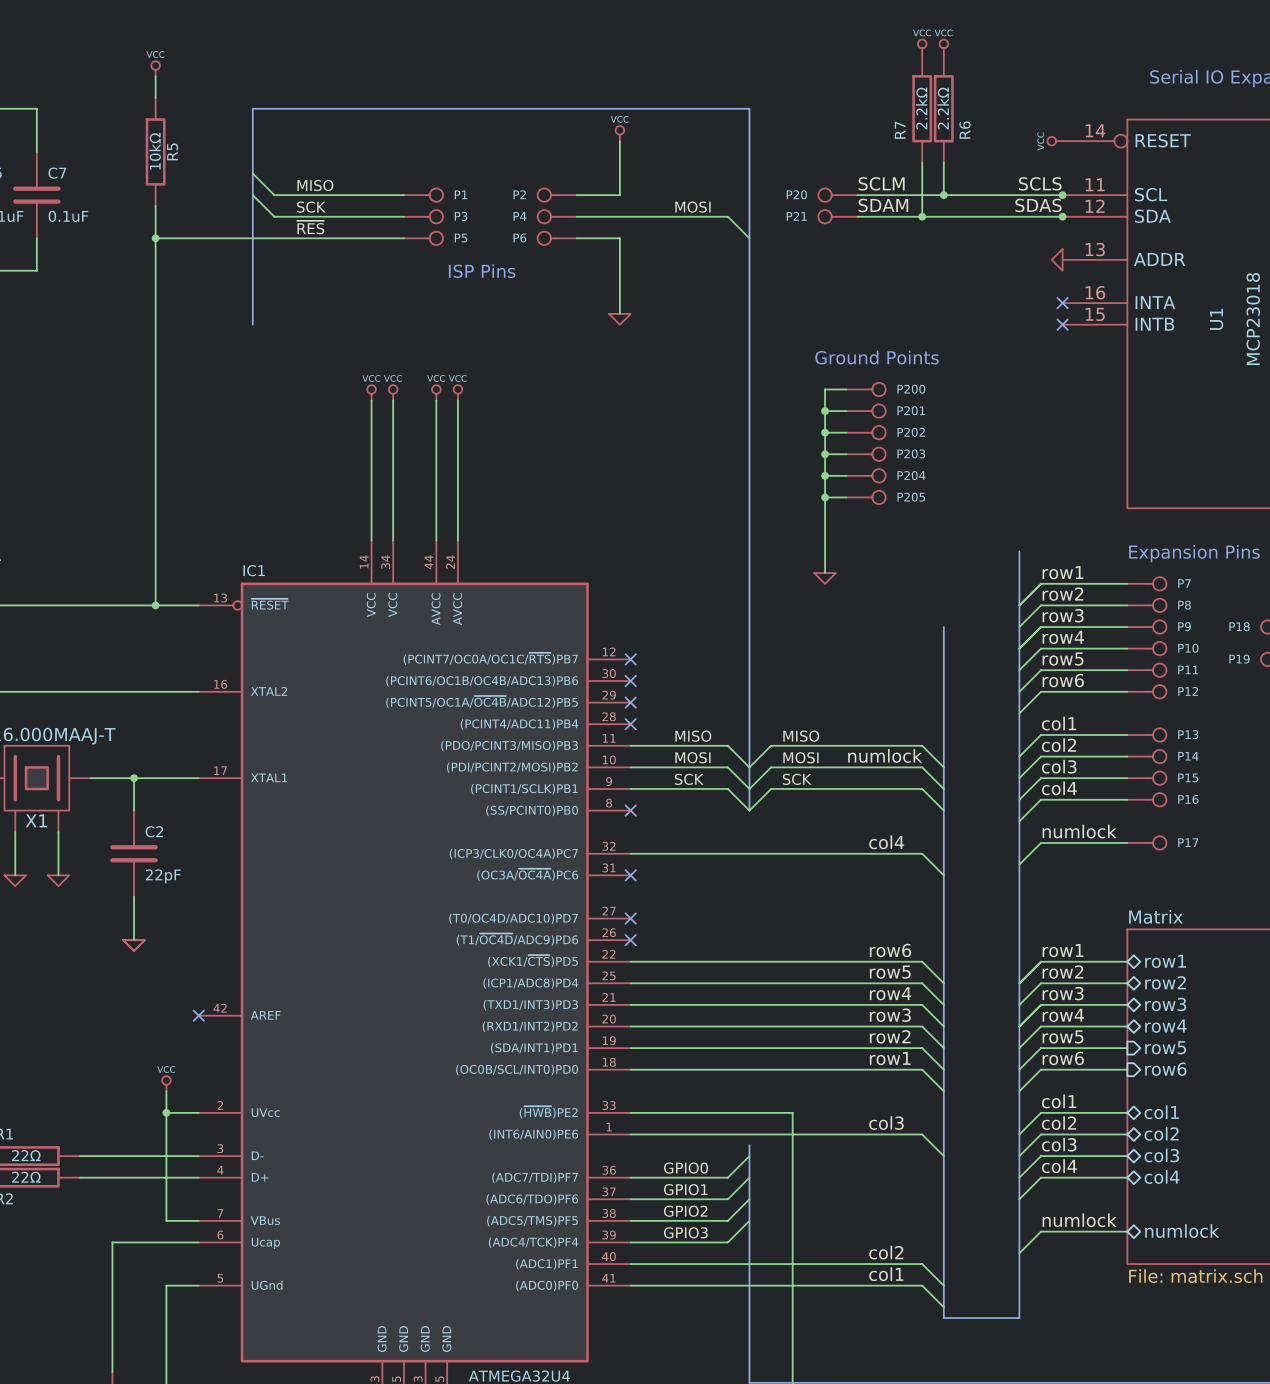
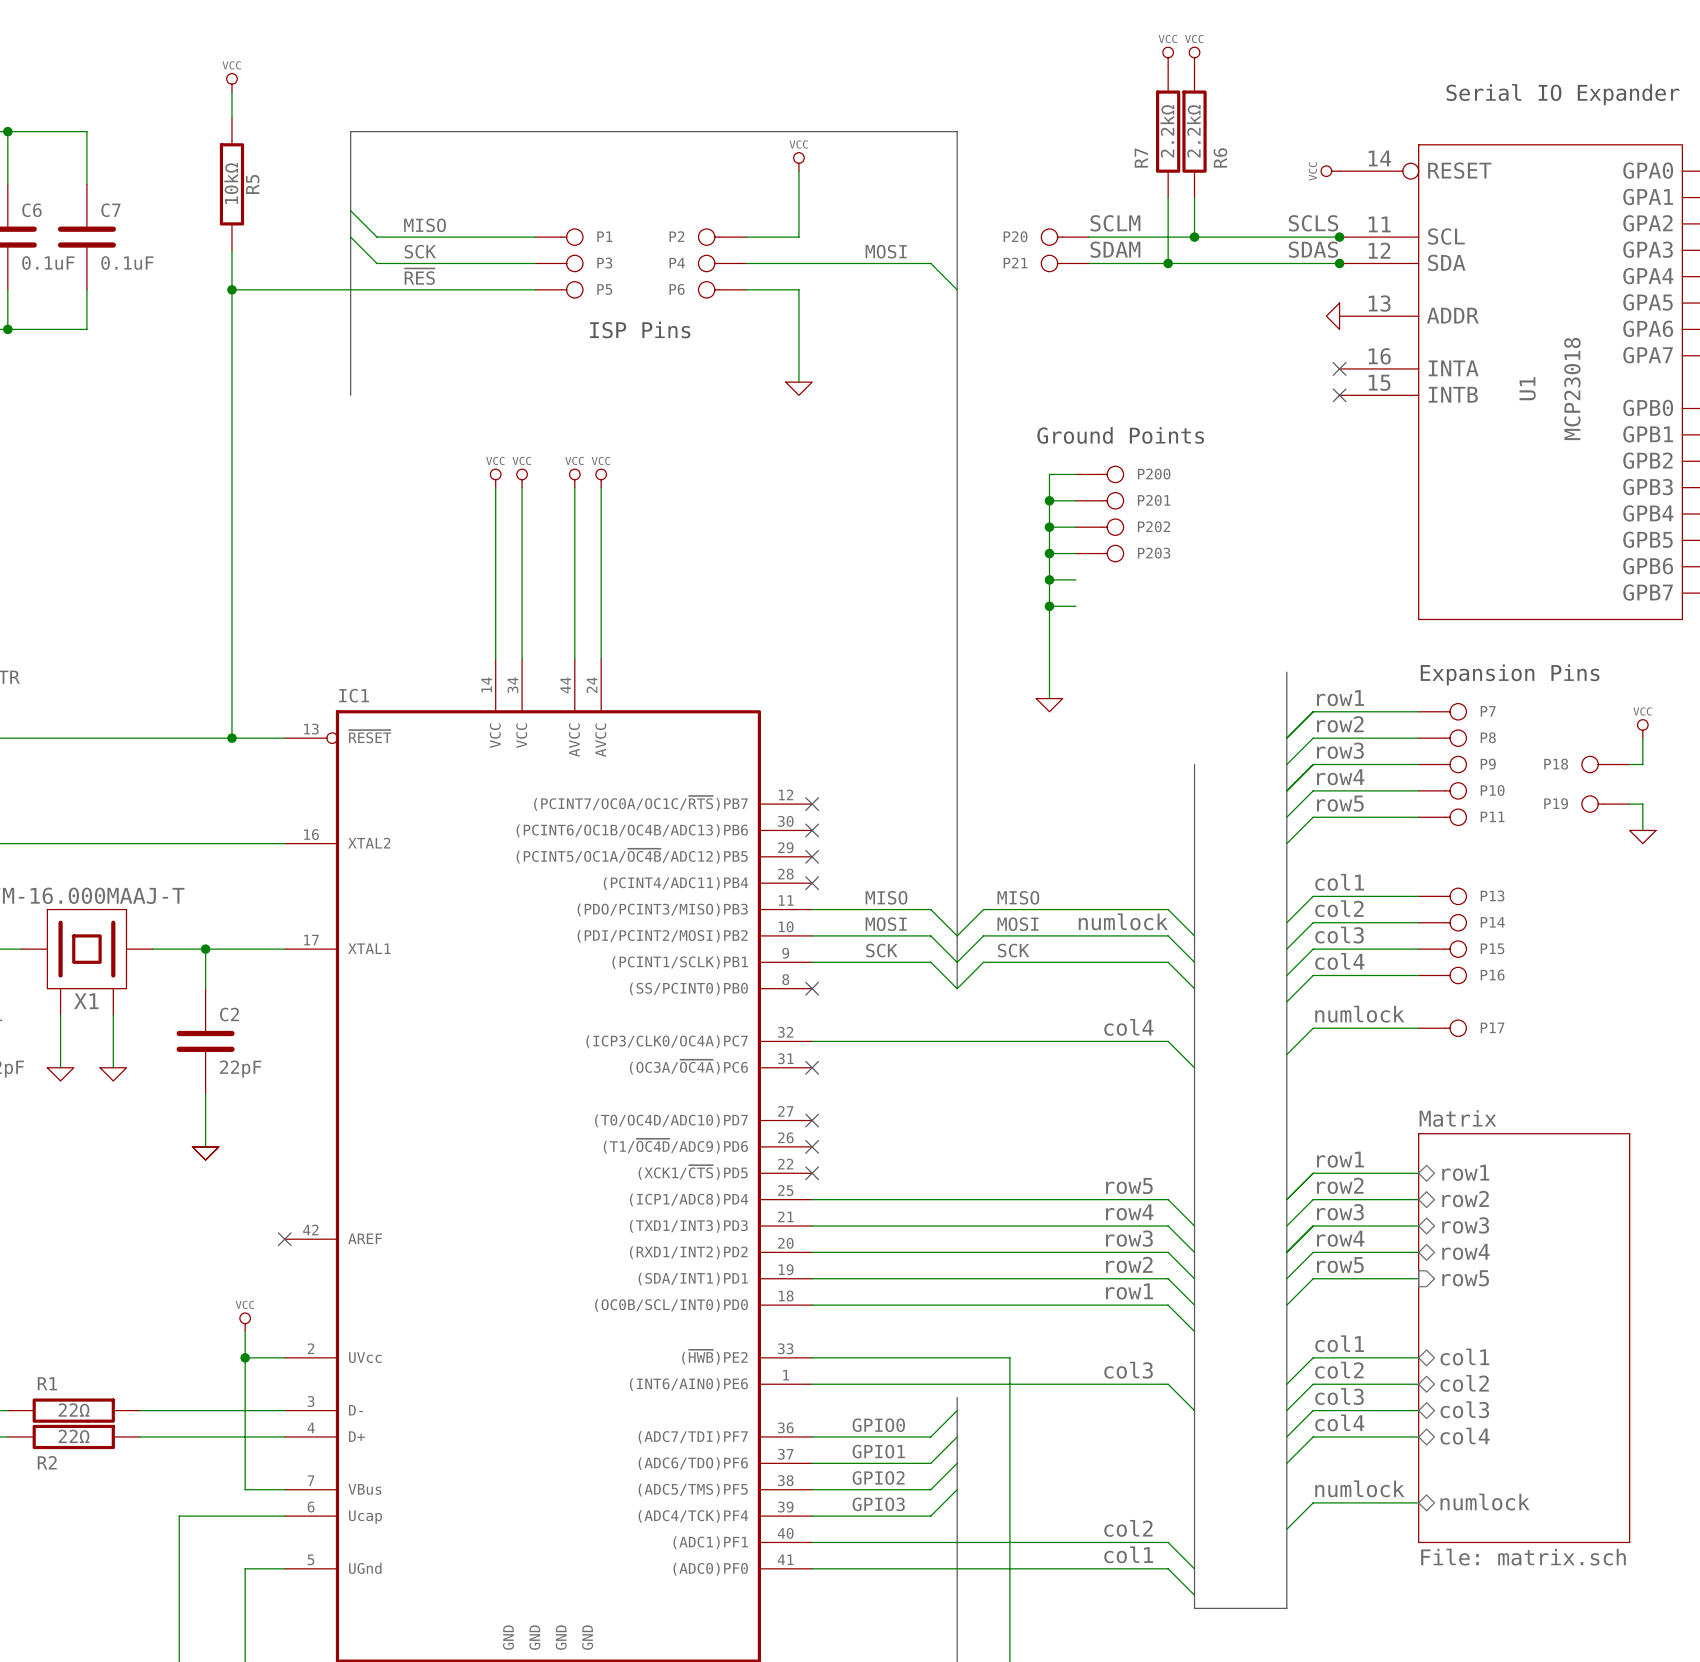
P204: (866, 475) -> none
P205: (866, 497) -> none
label: row6 (1063, 680) -> none
wire: (1127, 691) (1040, 691) (1019, 713) -> none
P12: (1146, 691) -> none
label: row6 (890, 950) -> none
wire: (630, 961) (922, 961) (943, 983) -> none
no-connect mark: none -> (812, 1173)
label: row6 (1063, 1058) -> none
wire: (1127, 1069) (1040, 1069) (1019, 1091) -> none
sheet pin: row6 (1165, 1069) -> none

